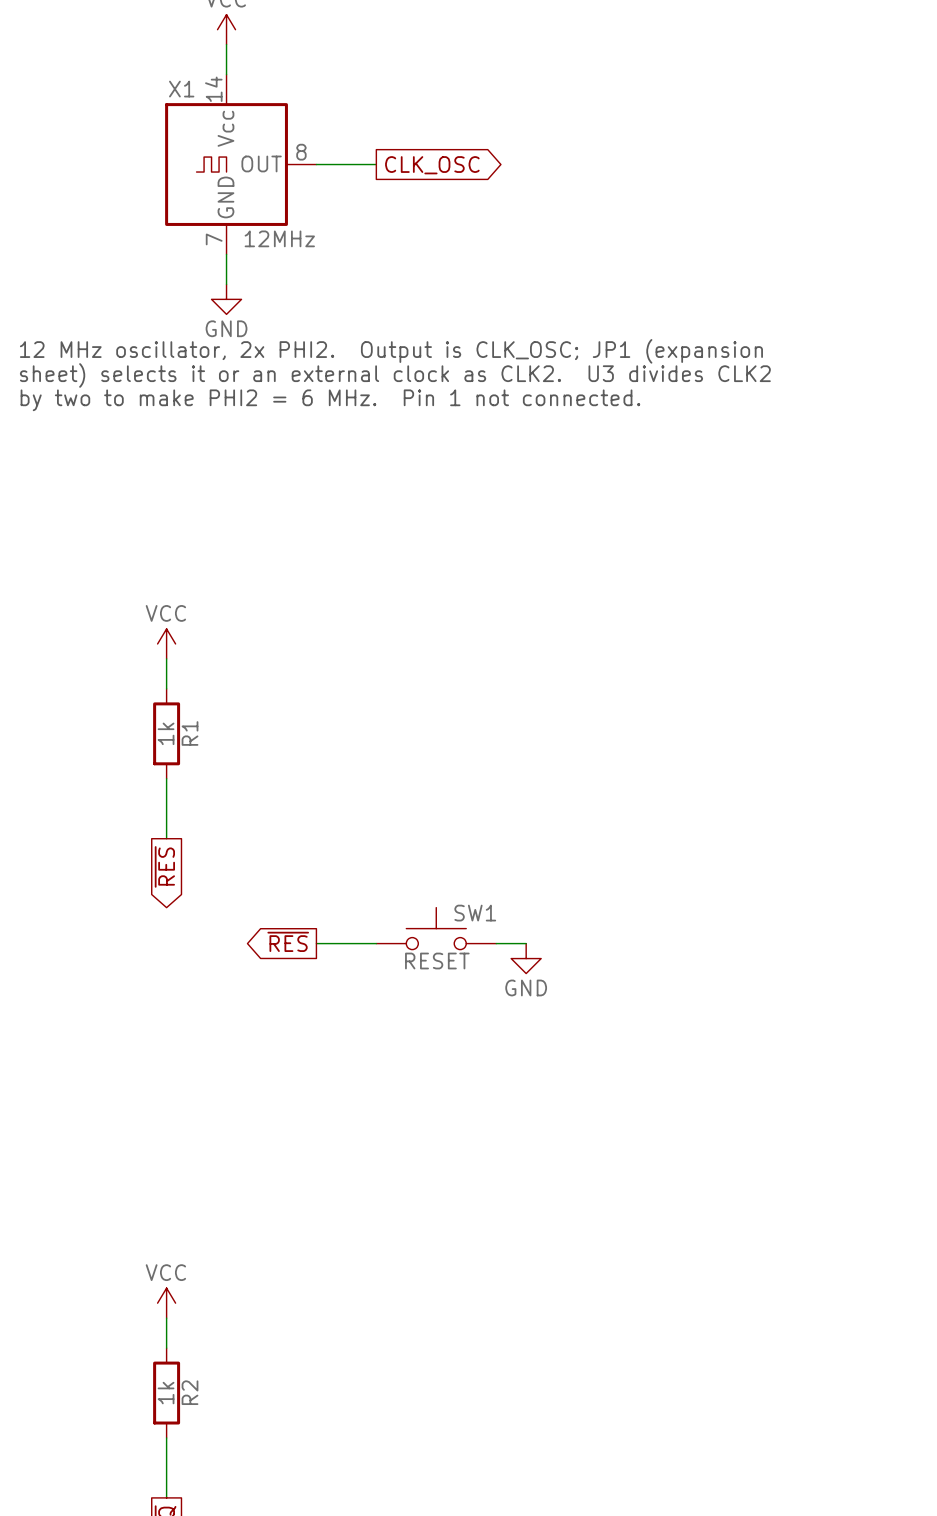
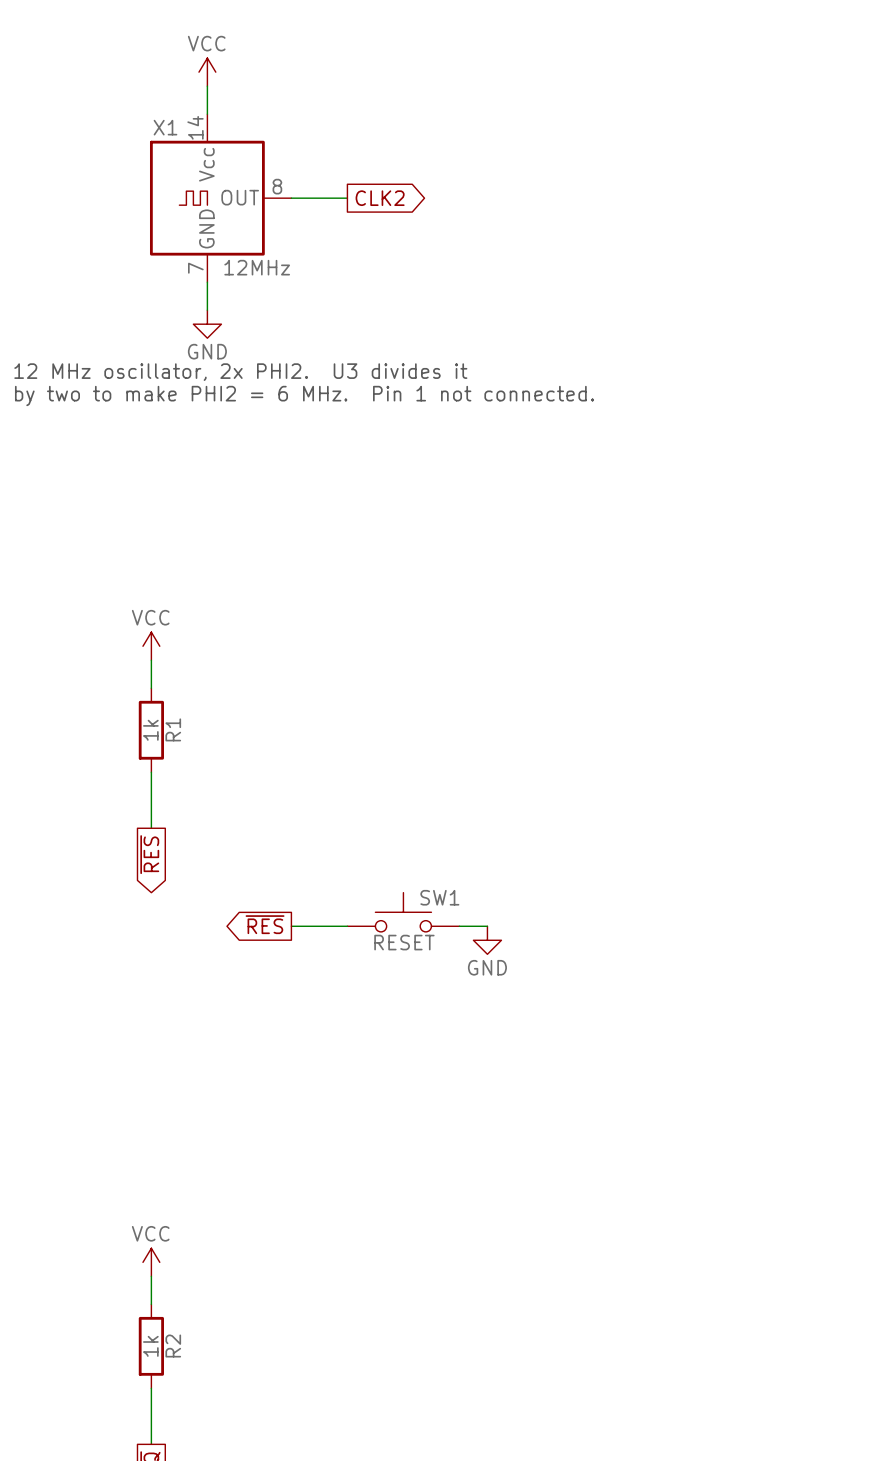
global label: CLK_OSC (432, 165) -> CLK2 (380, 198)
text: 12 MHz oscillator, 2x PHI2. Output is CLK_OSC; JP1 (expansion (391, 351) -> 12 MHz oscillator, 2x PHI2. U3 divides it (240, 372)
text: sheet) selects it or an external clock as CLK2. U3 divides CLK2 (395, 375) -> by two to make PHI2 = 6 MHz. Pin 1 not connected. (304, 395)
text: by two to make PHI2 = 6 MHz. Pin 1 not connected. (330, 400) -> none

